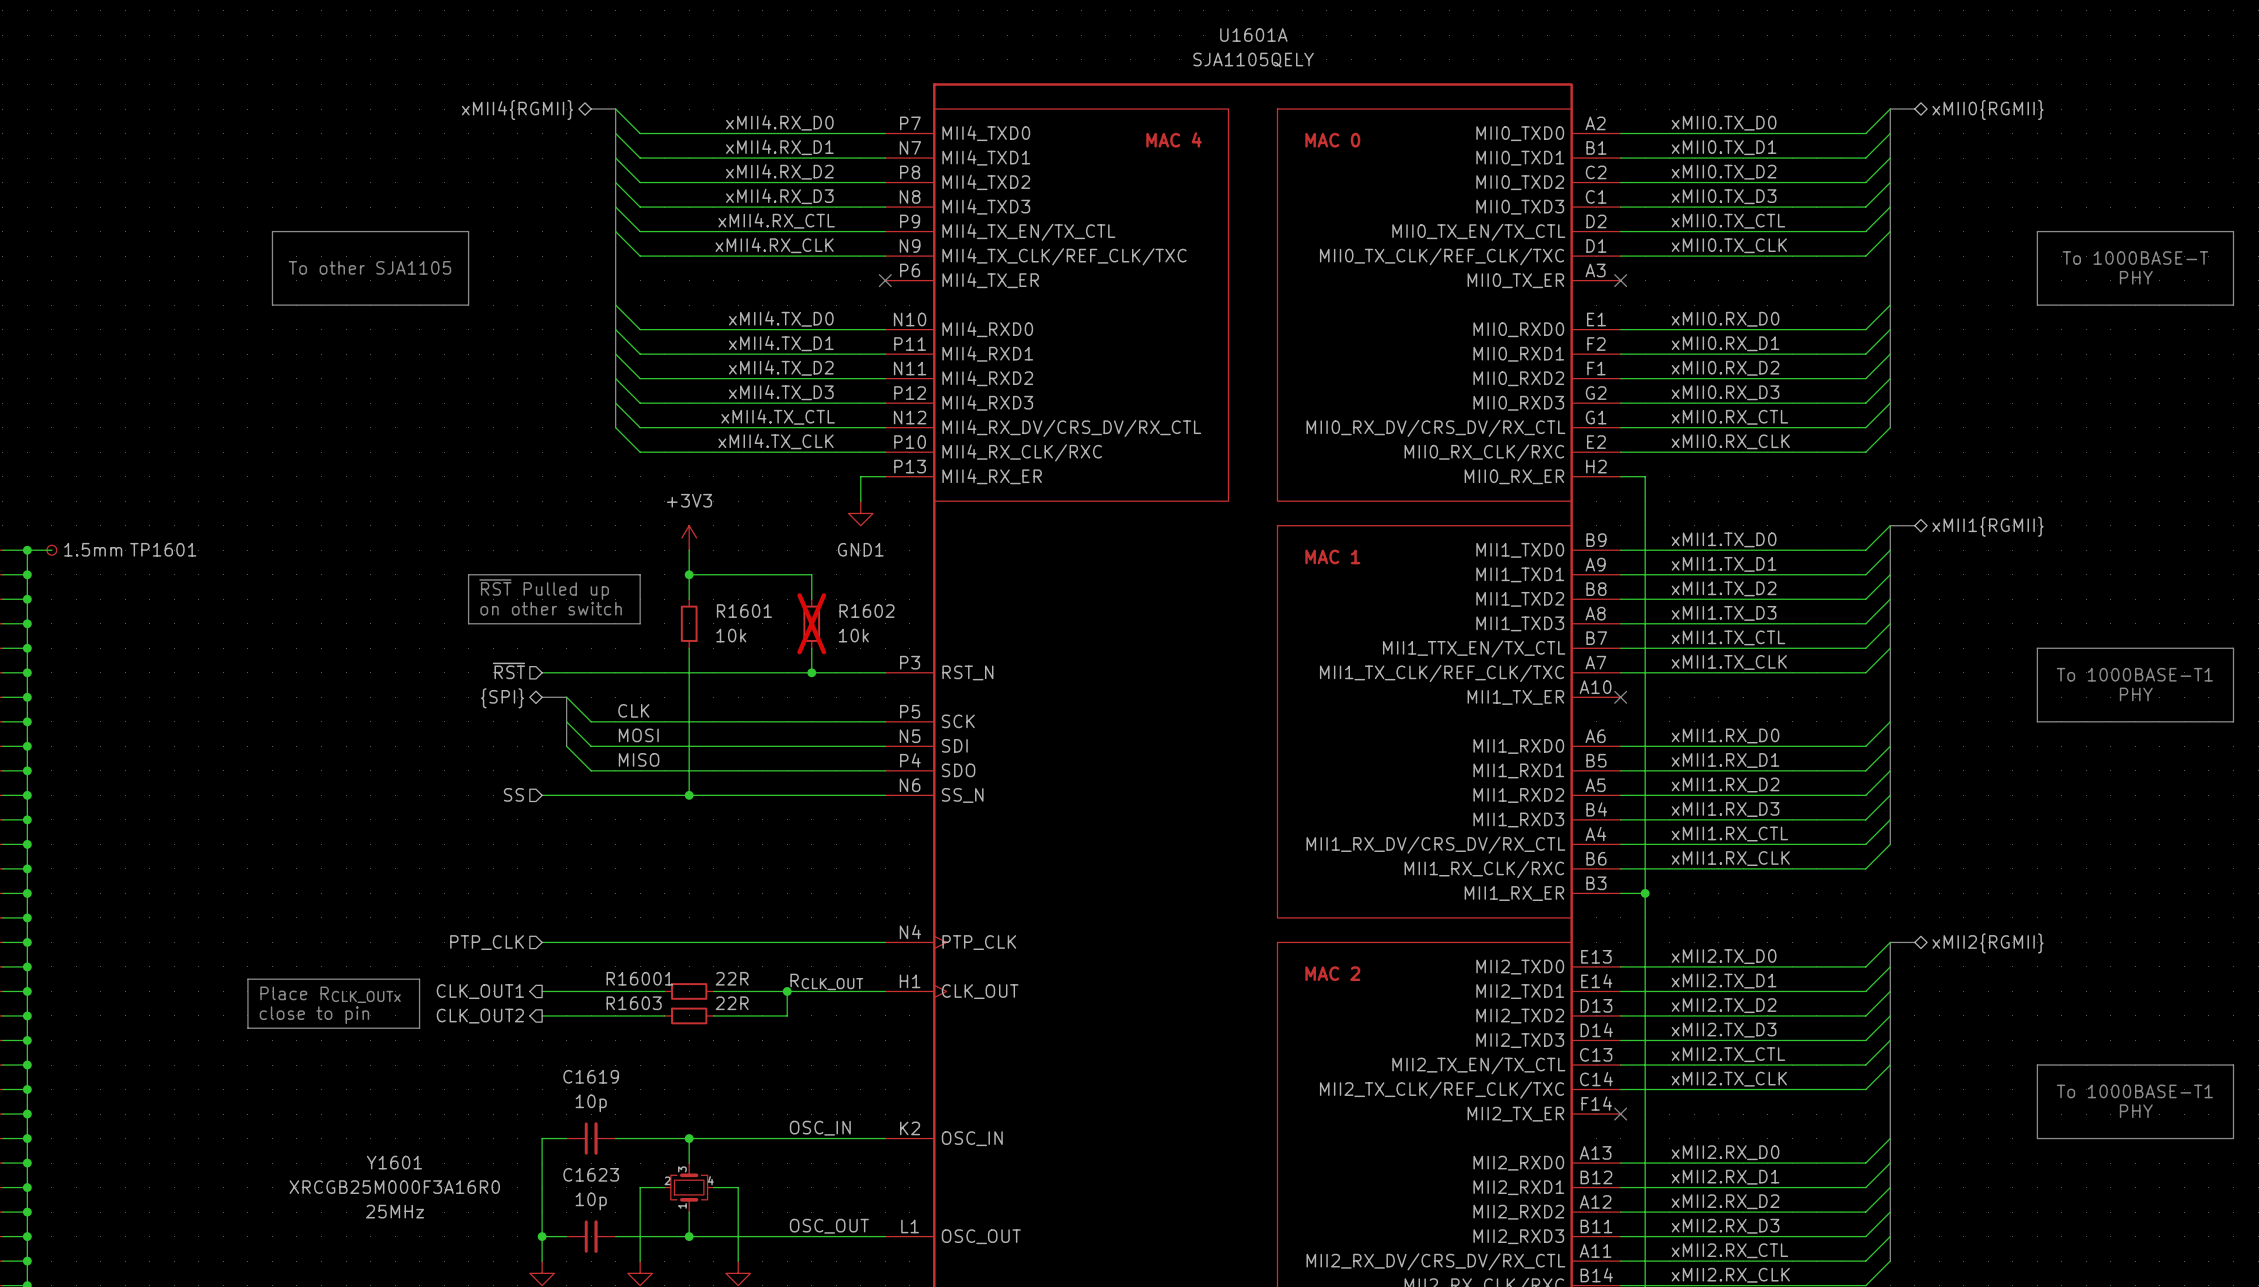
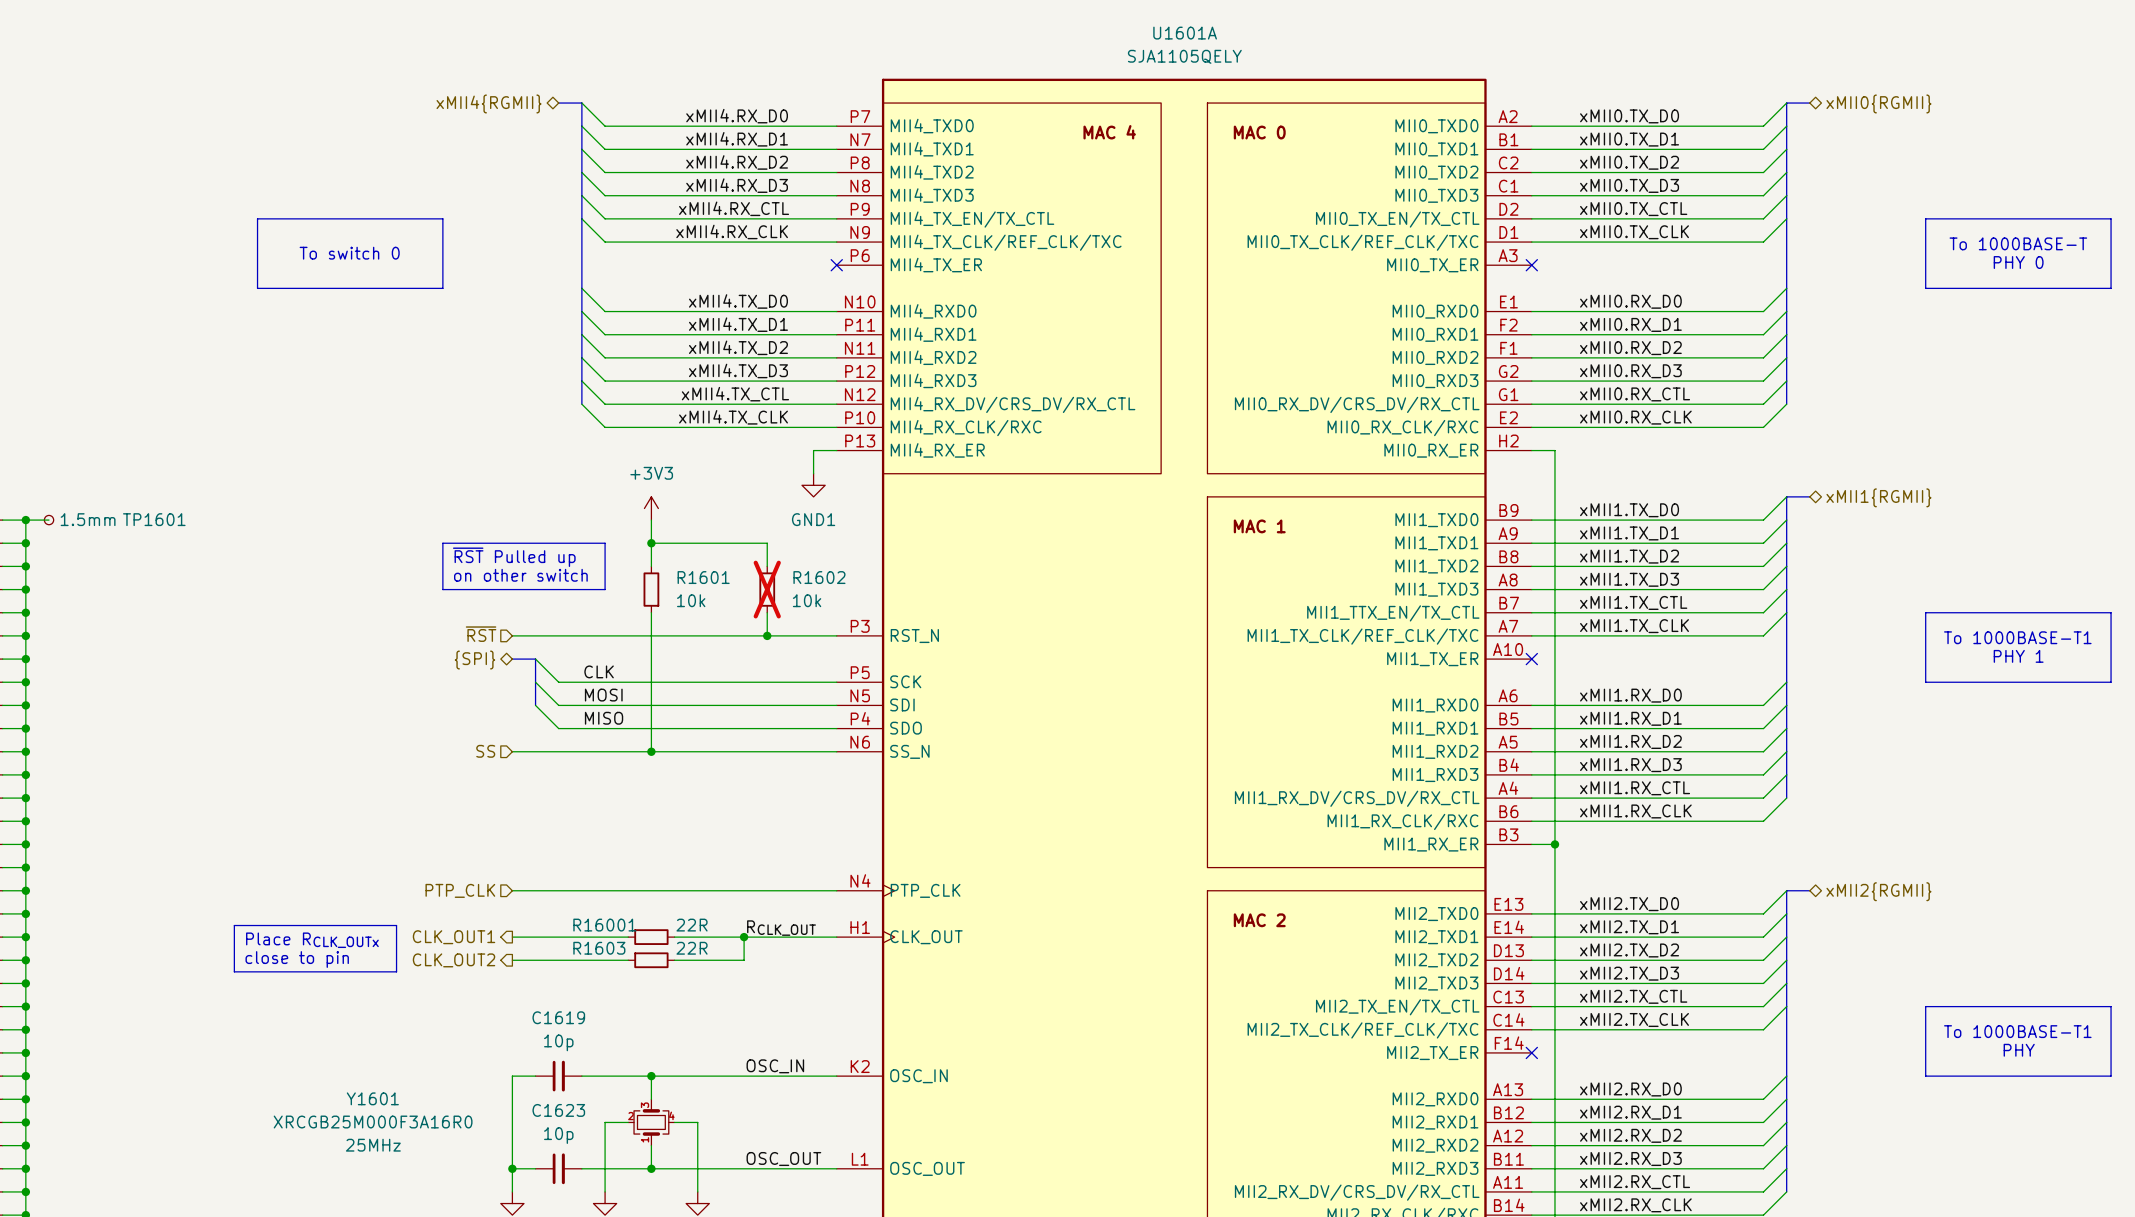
text: To other SJA1105 (369, 267) -> To switch 0 (349, 253)
text: PHY (2136, 277) -> PHY 0 (2018, 262)
text: PHY (2136, 694) -> PHY 1 (2018, 656)

